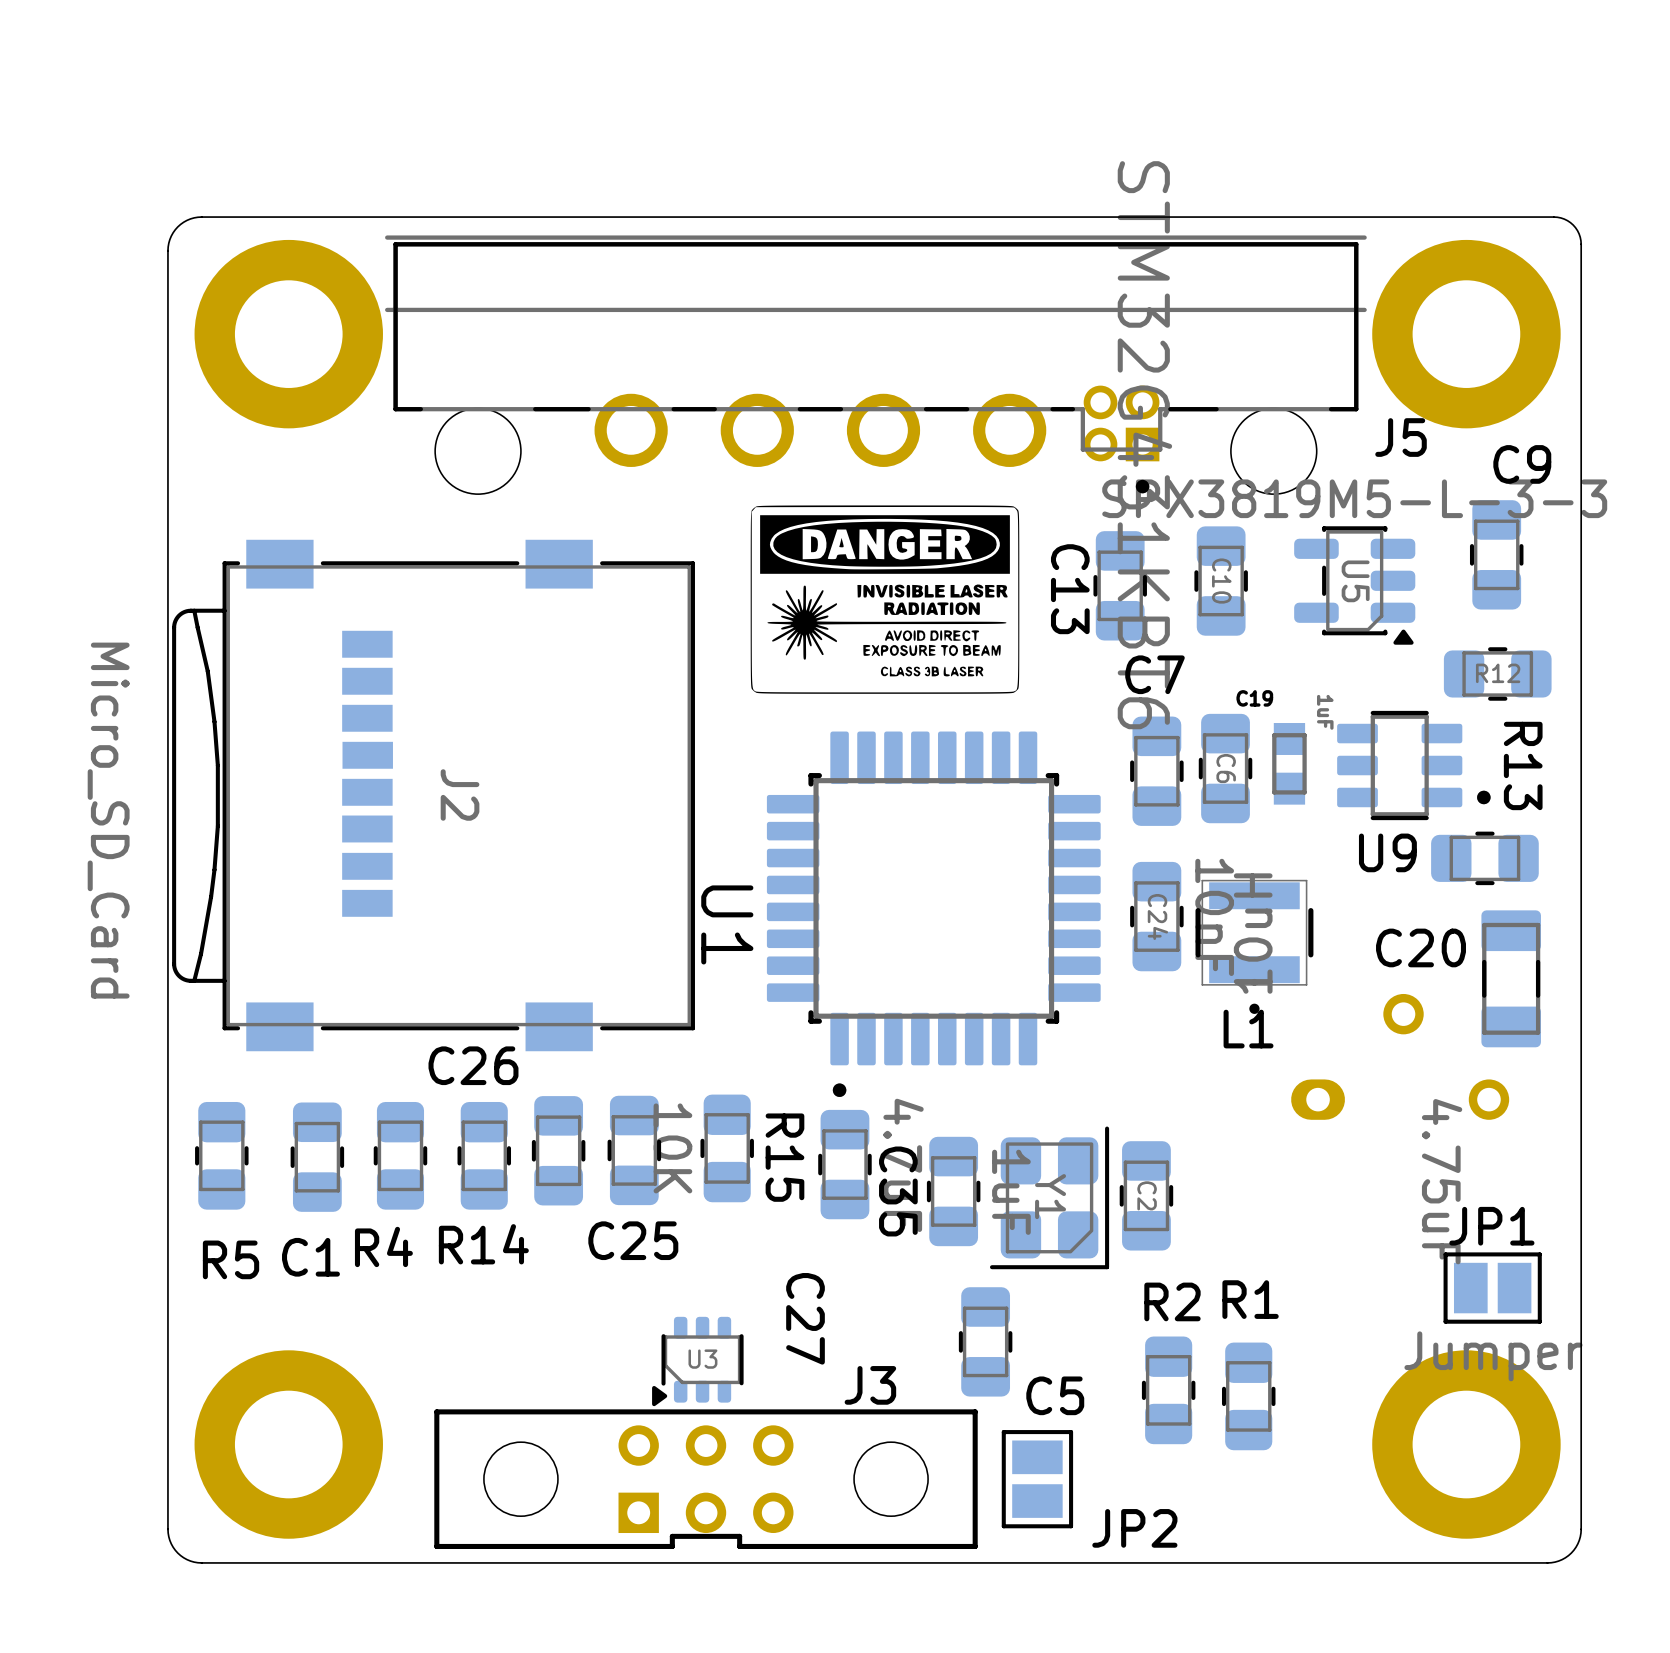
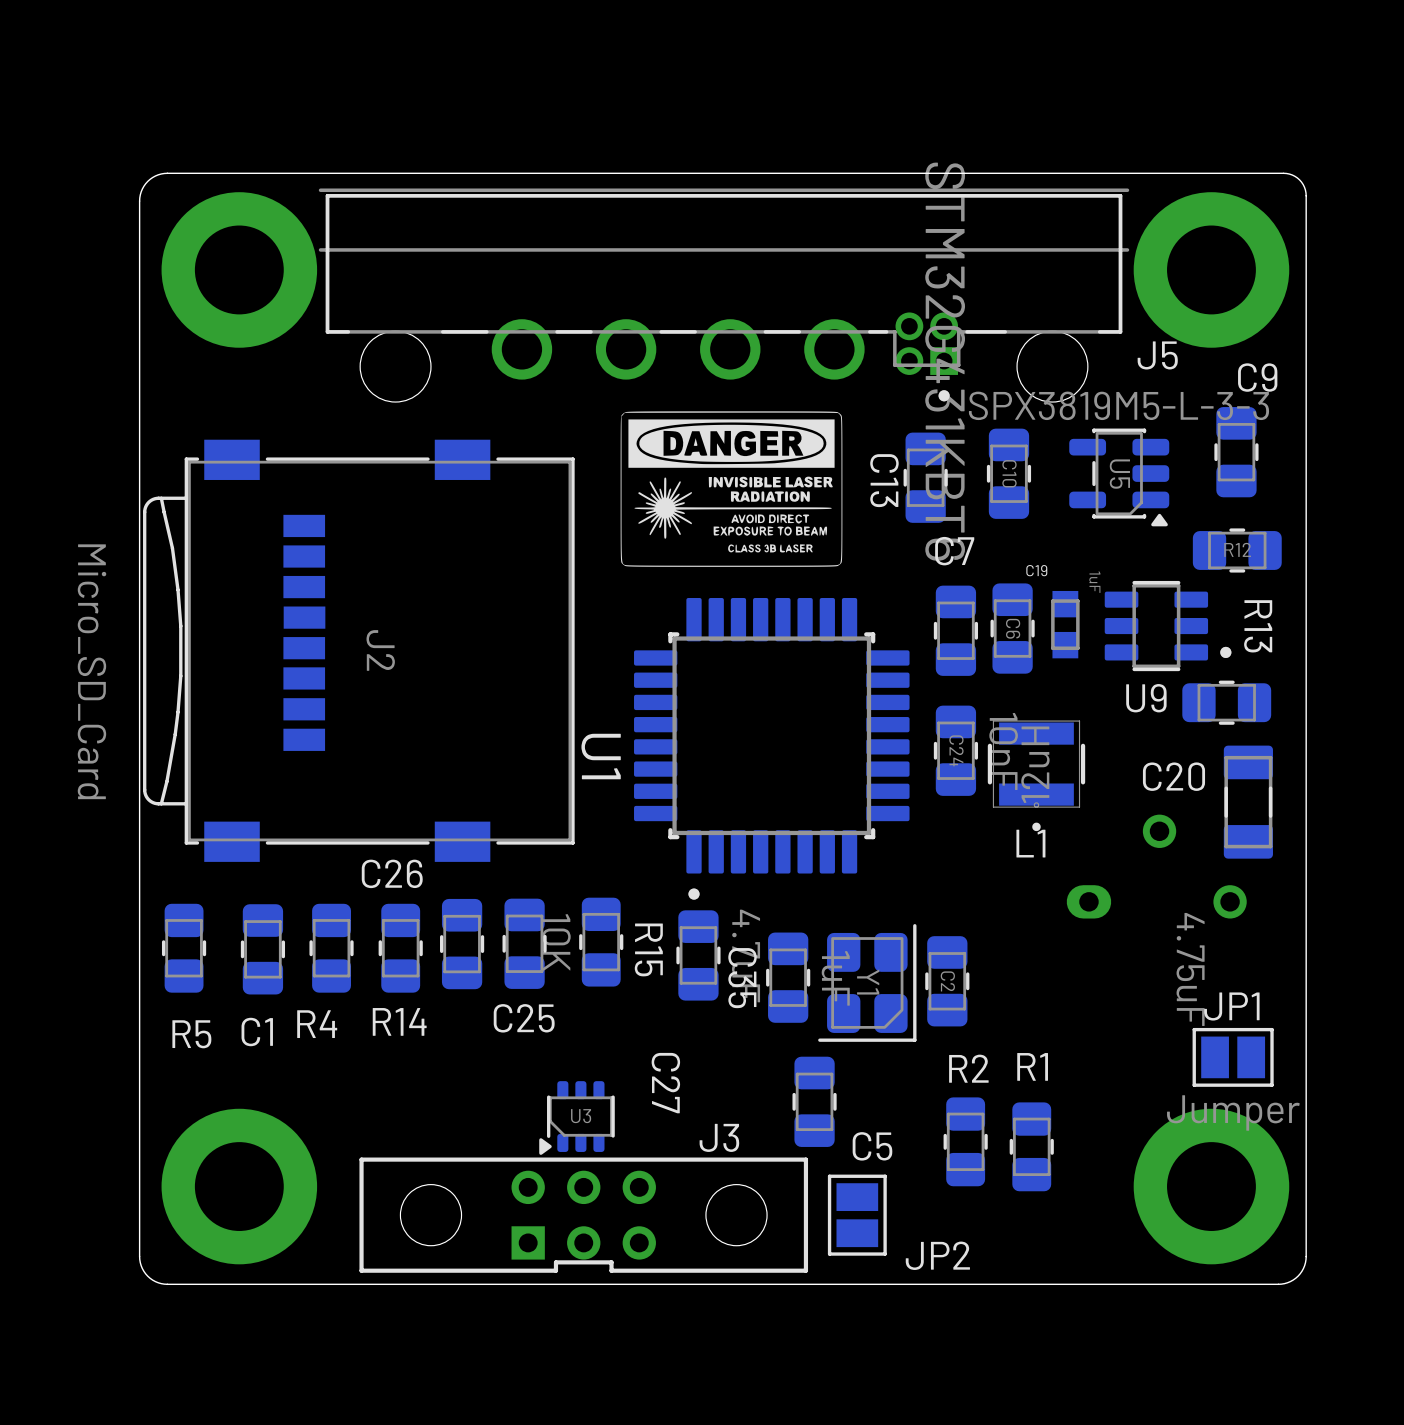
L1 value: 10uH (1253, 933) -> 12uH (1035, 764)

